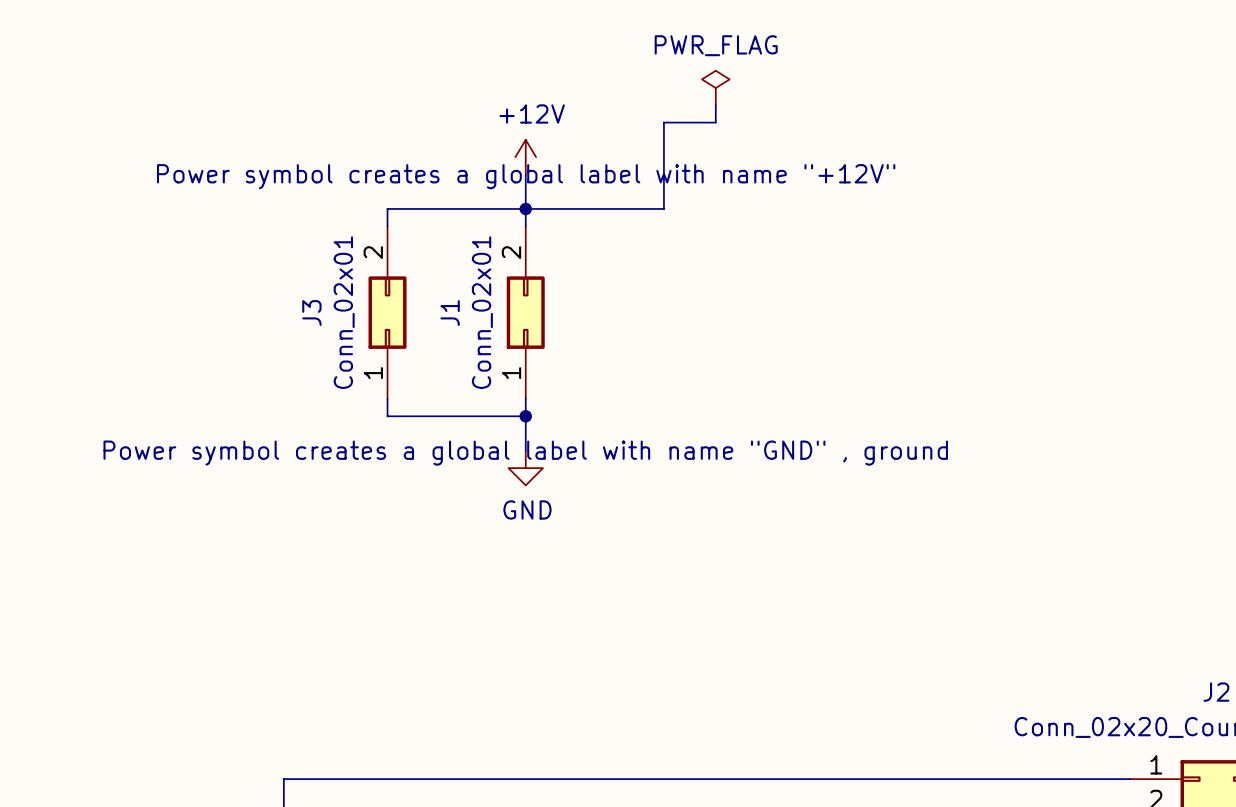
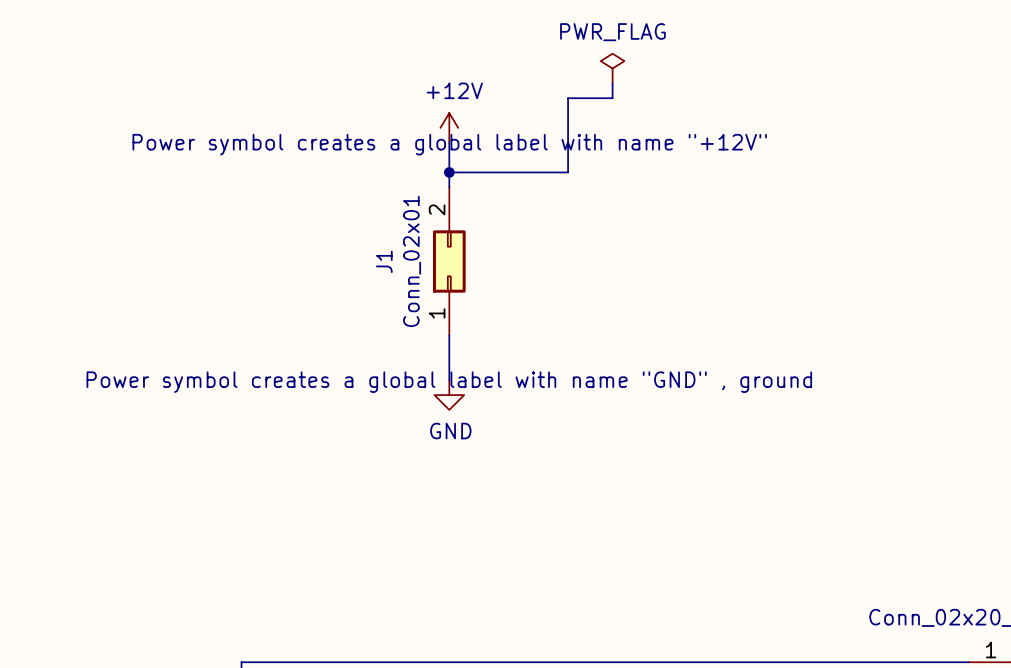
wire: (525, 208) (387, 208) (387, 226) -> none
J3: Conn_02x01 (387, 312) -> none
wire: (387, 399) (387, 416) (525, 416) -> none
junction: (525, 416) -> none

